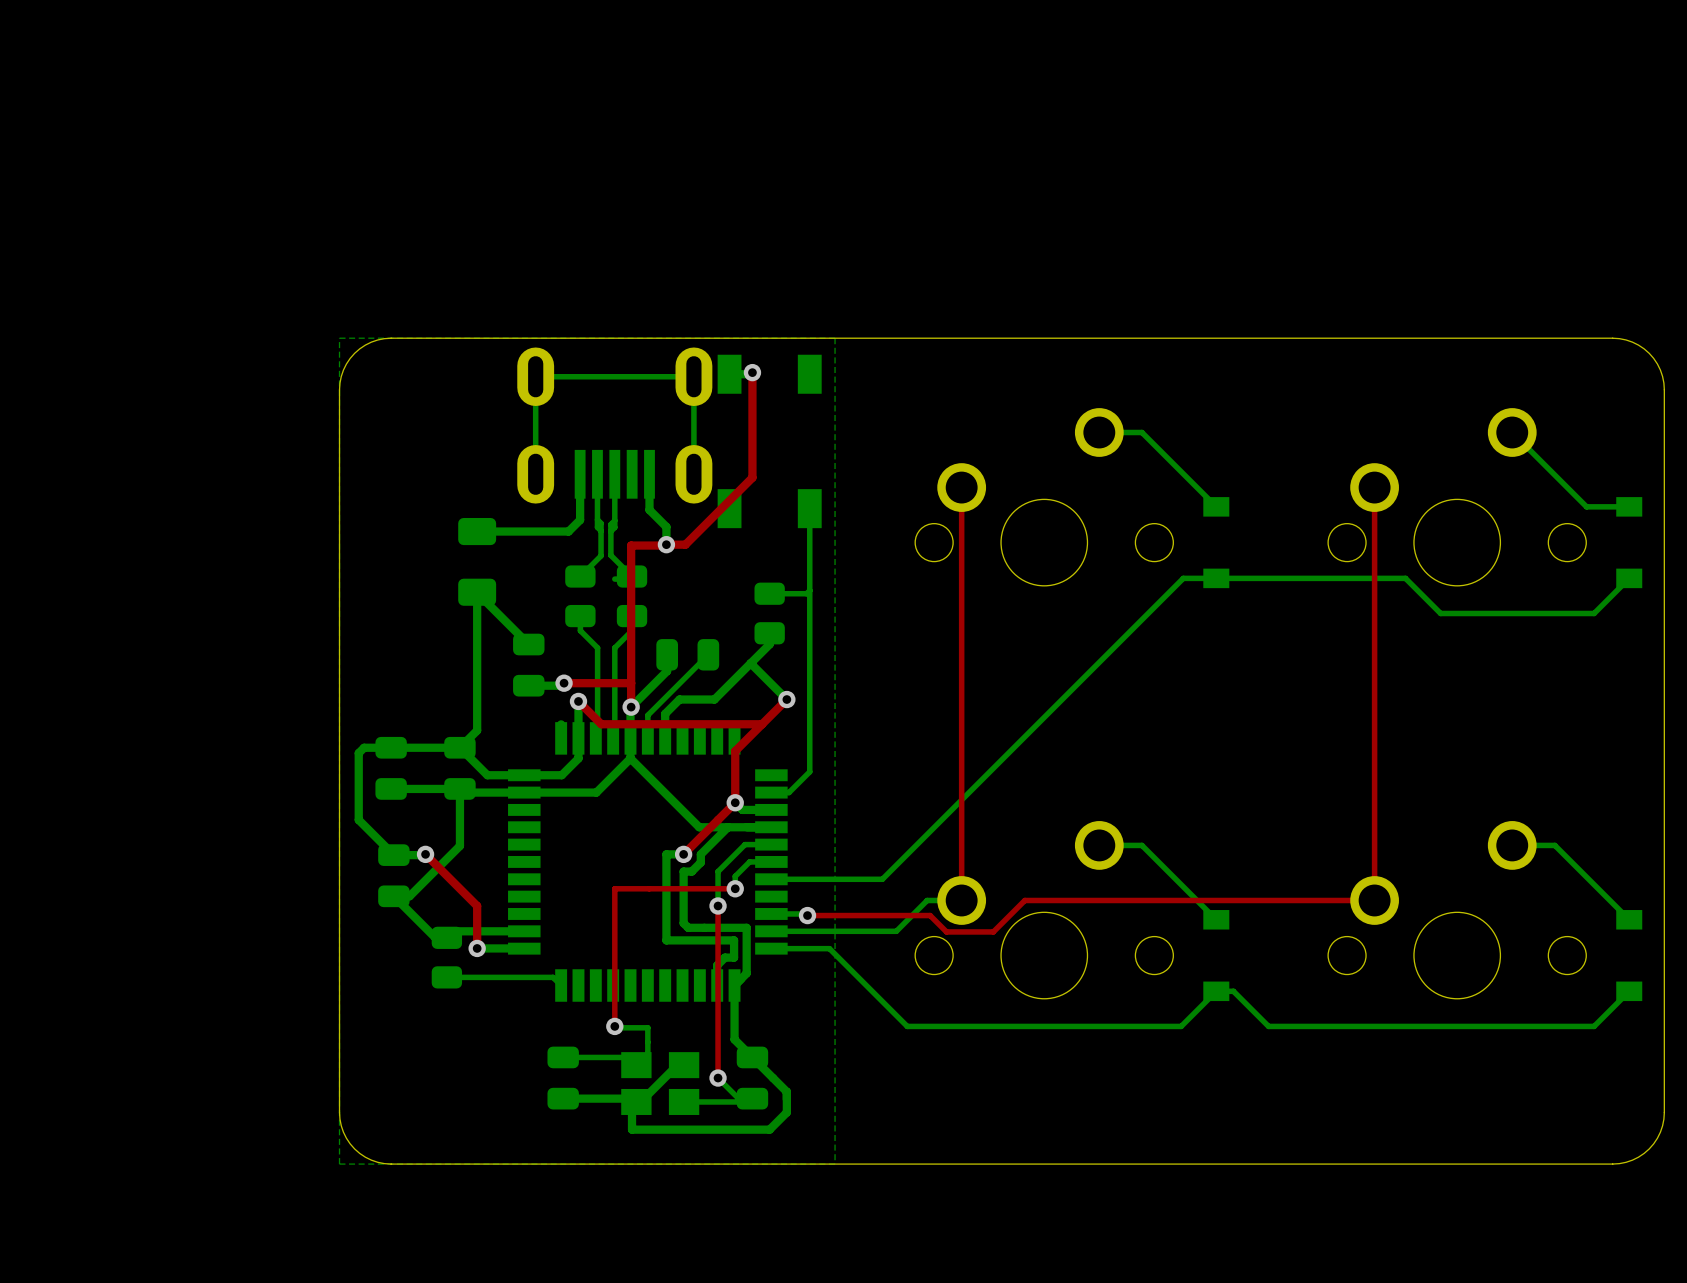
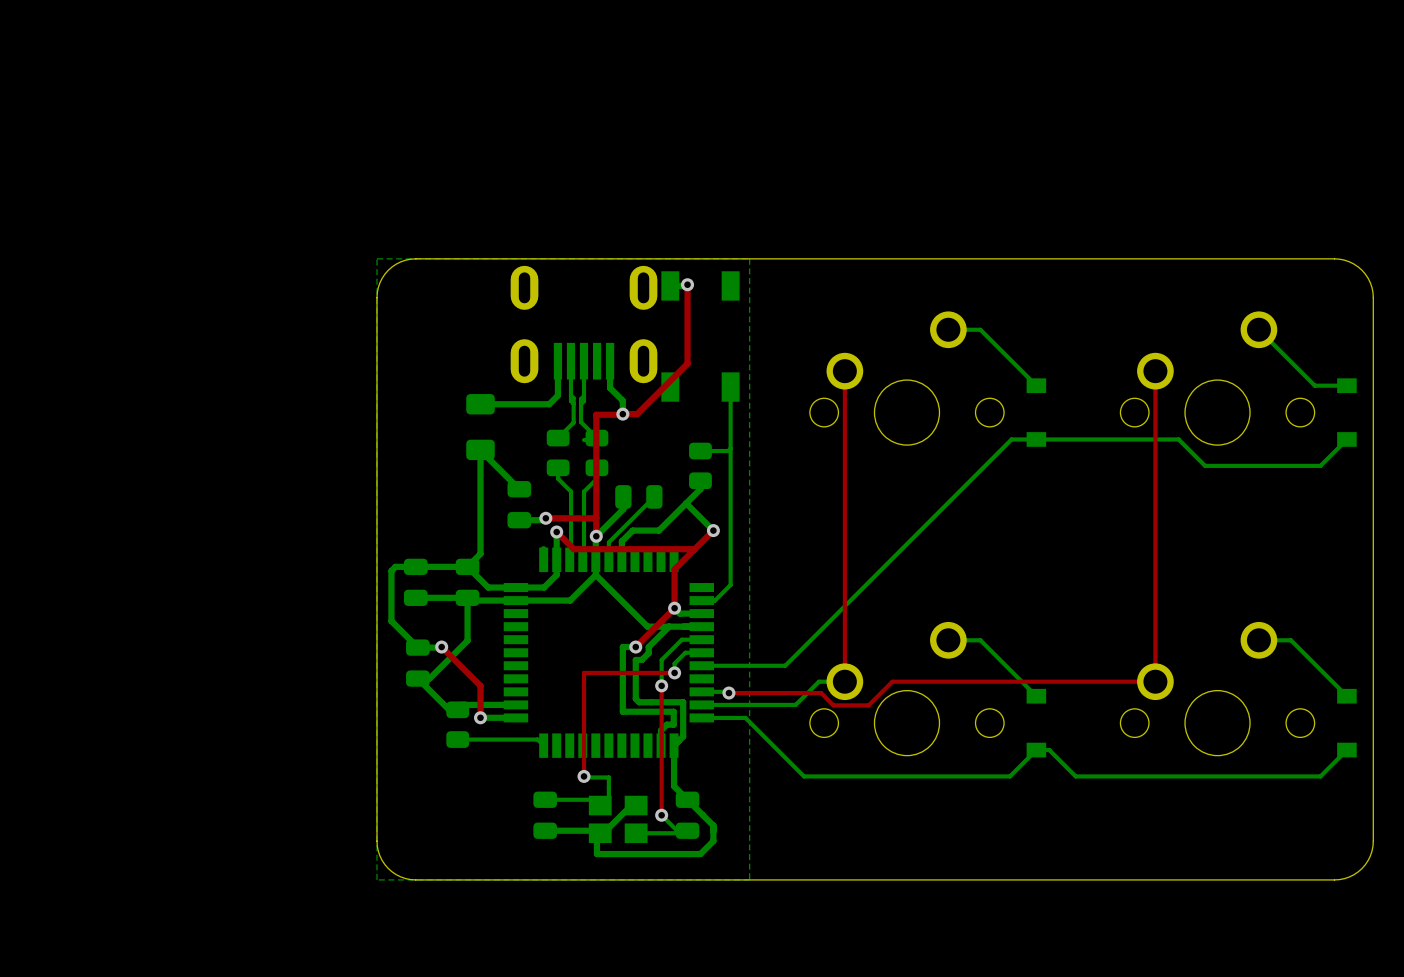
bottom track: (535, 474) (535, 376) (693, 376) (693, 474) -> none

